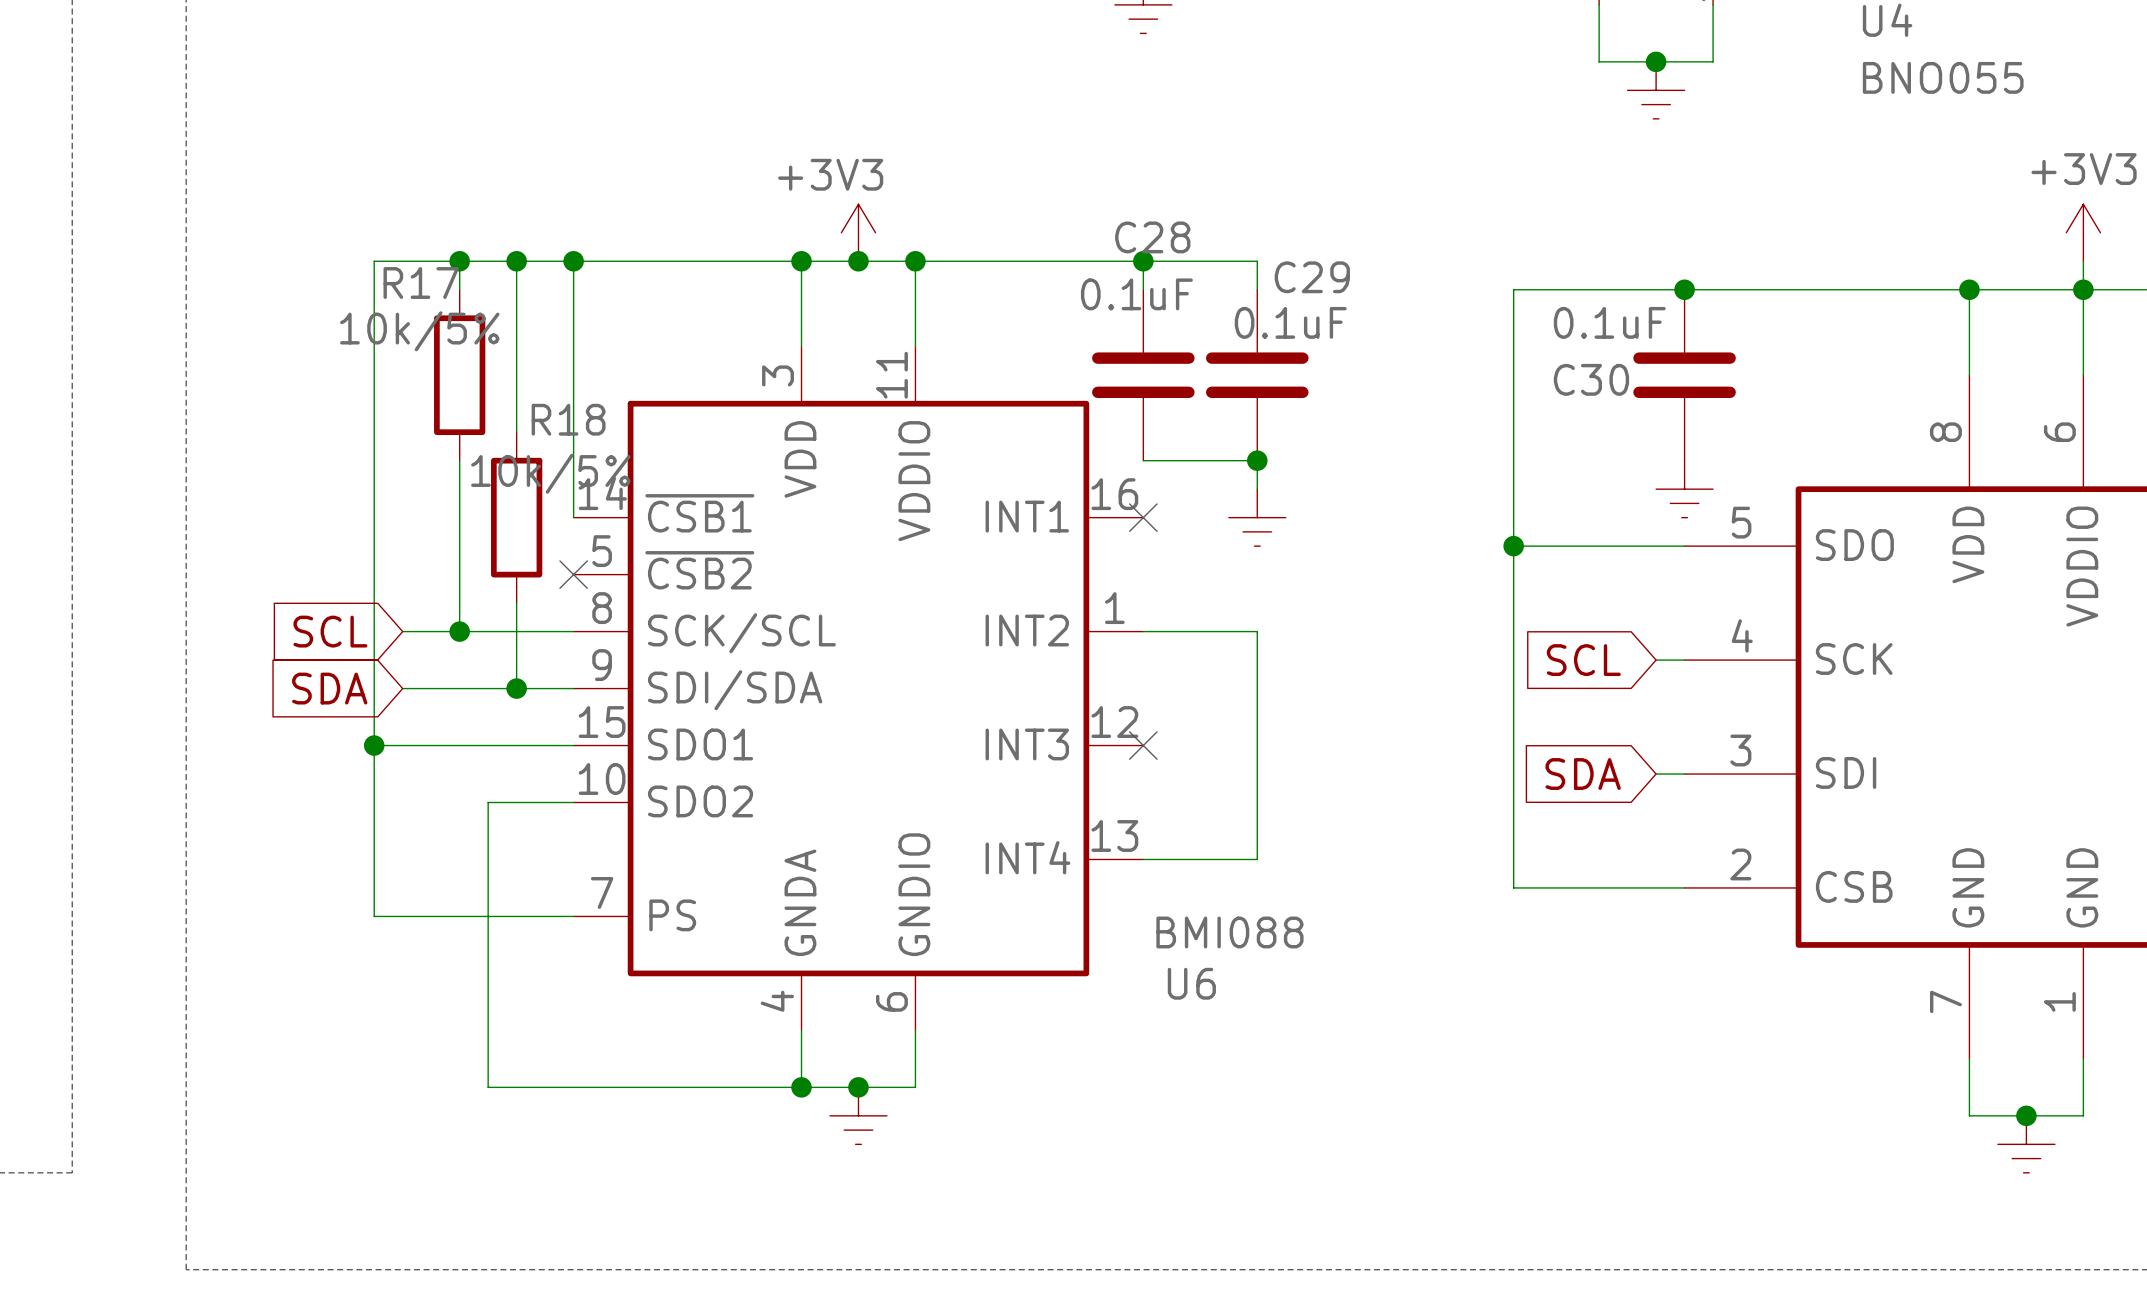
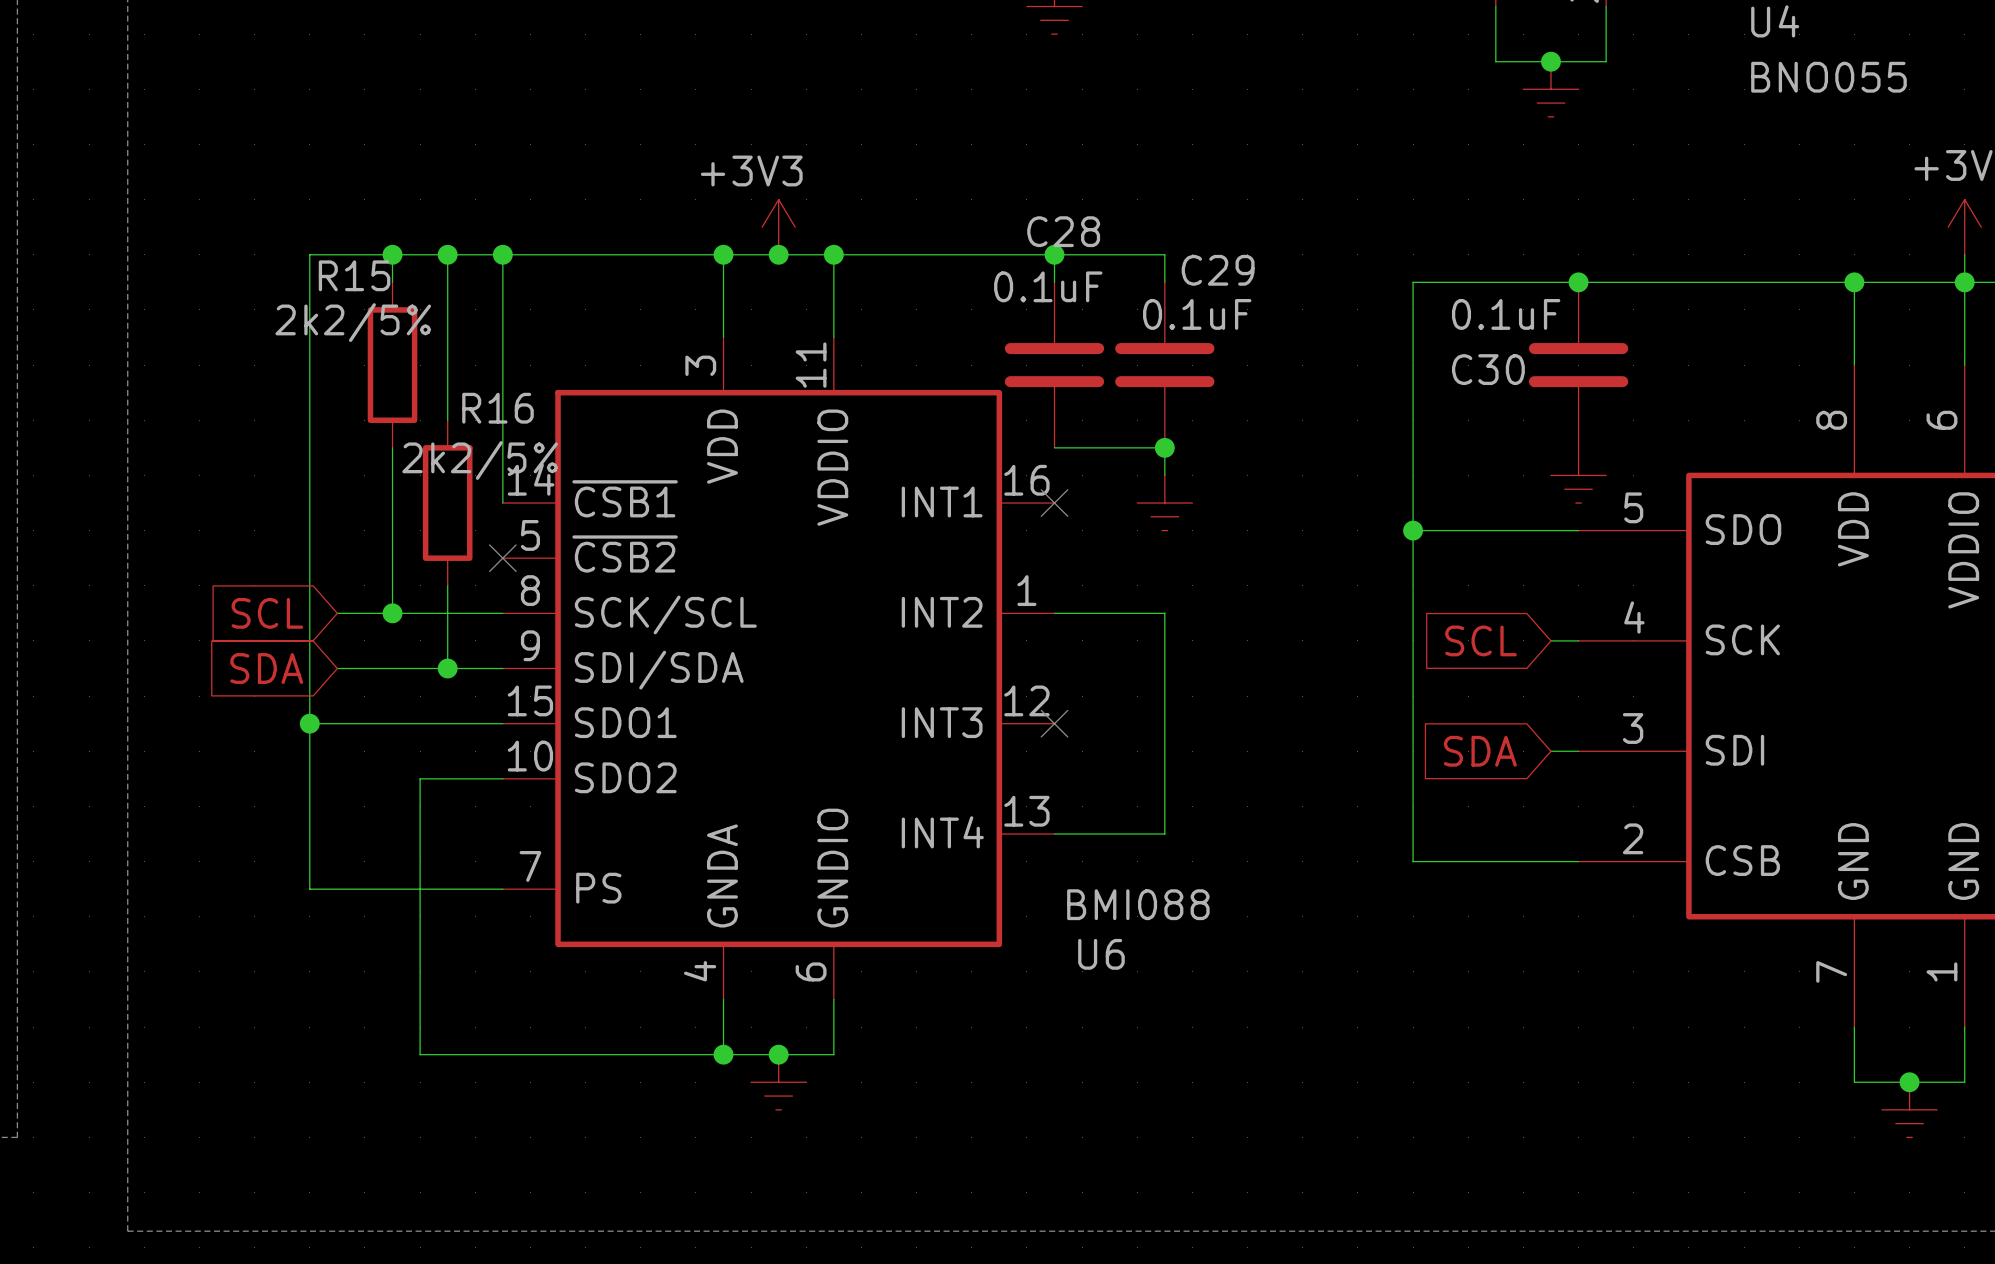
R17 name: R17 (421, 283) -> R15 (354, 275)
R17 value: 10k/5% (419, 331) -> 2k2/5% (353, 322)
R18 name: R18 (568, 419) -> R16 (497, 408)
R18 value: 10k/5% (550, 473) -> 2k2/5% (480, 460)

